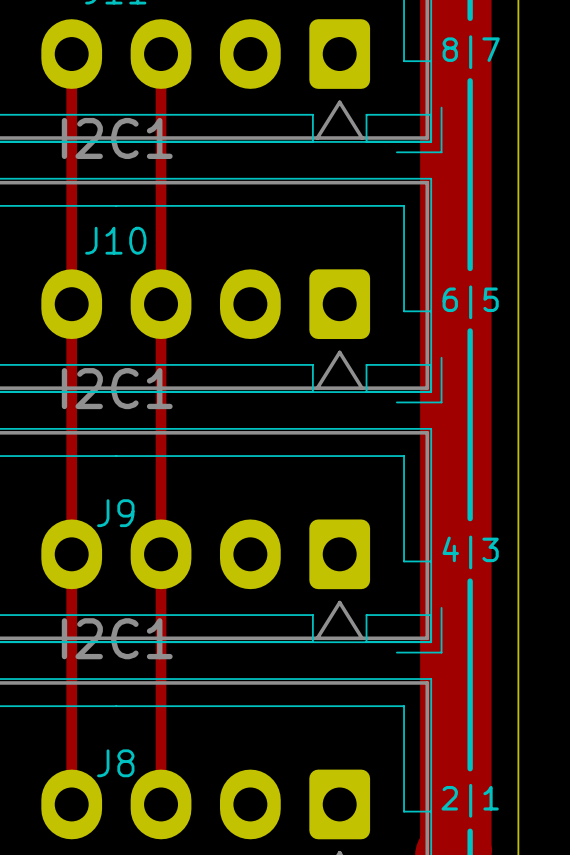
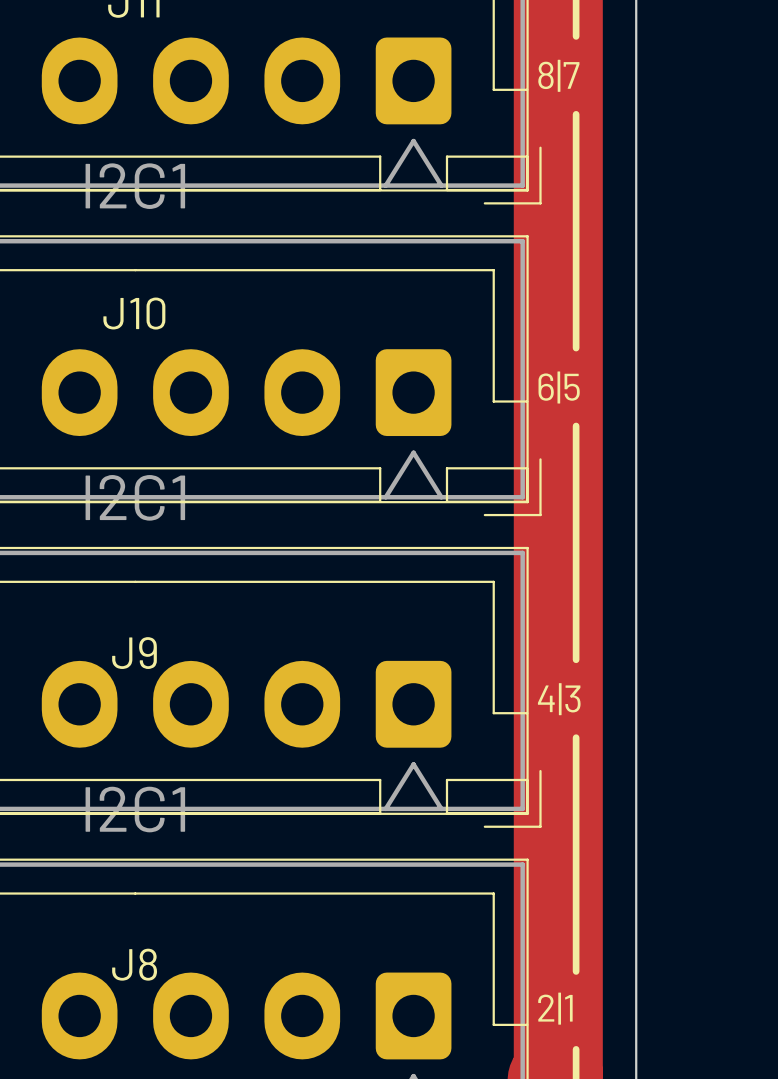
track: (71, 54) (71, 804) -> none
track: (161, 54) (161, 804) -> none

